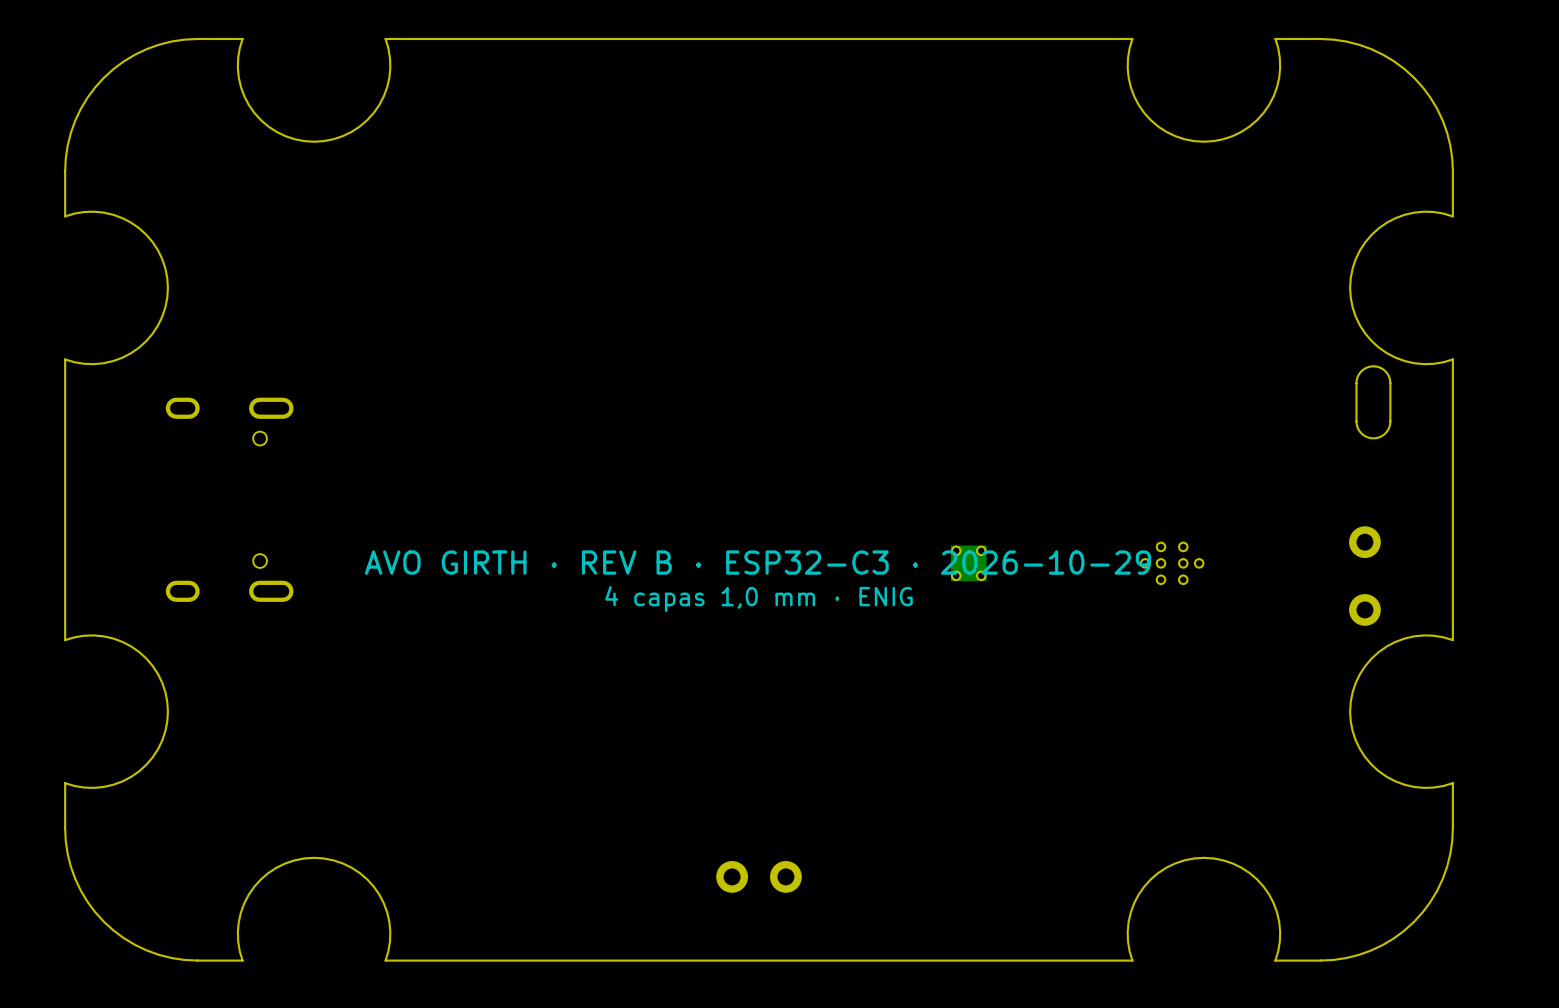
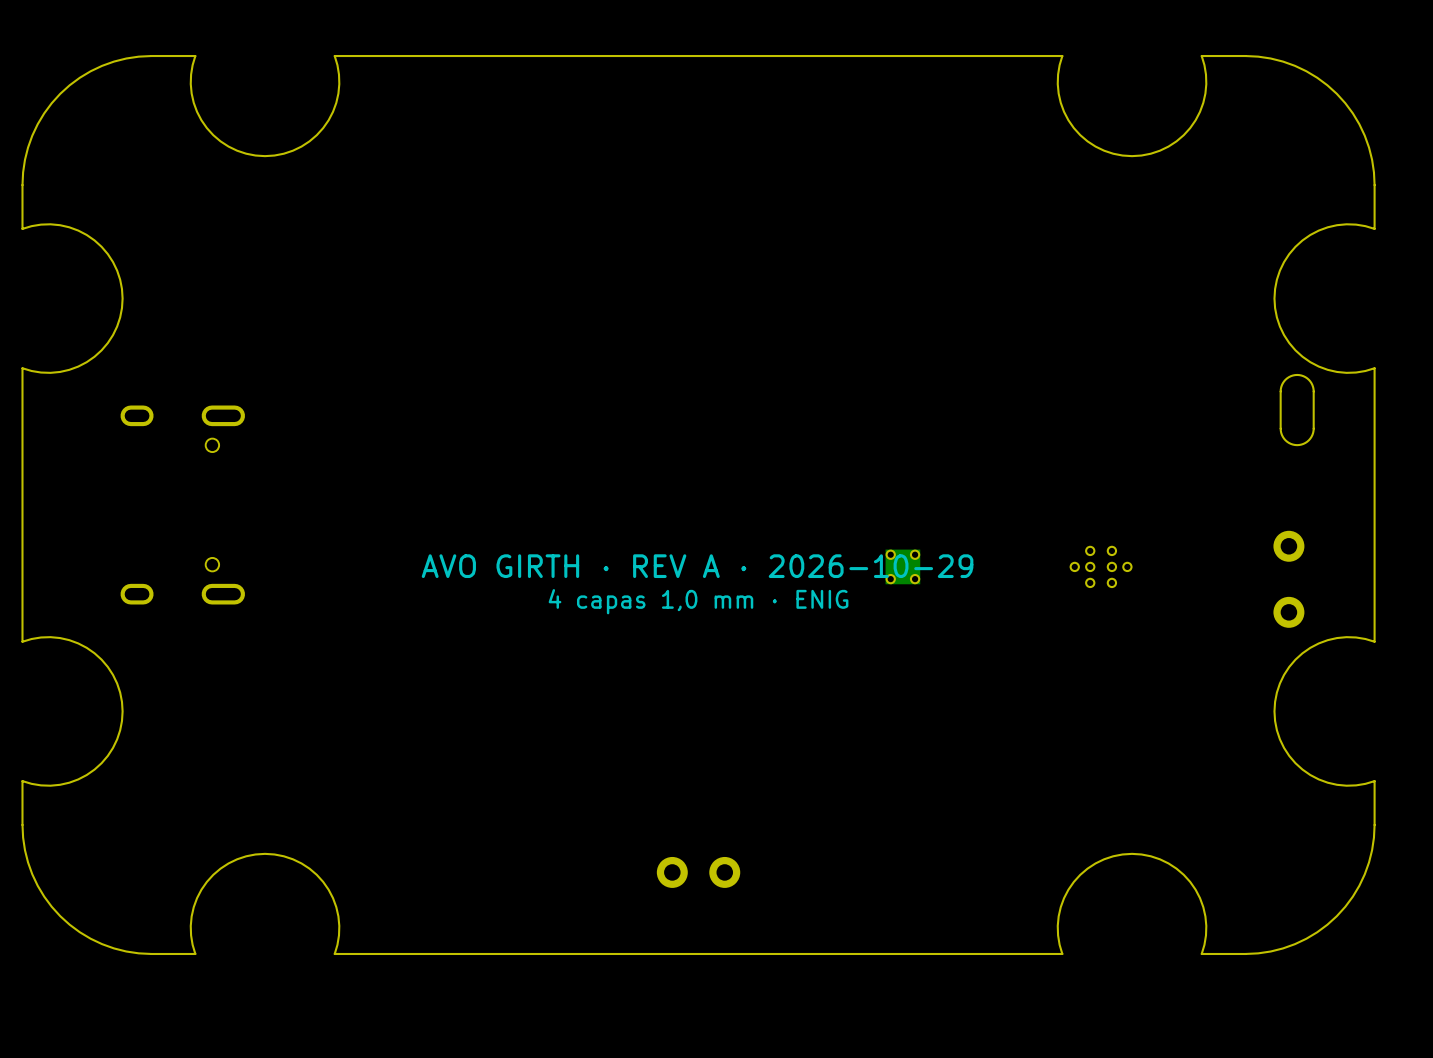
text: AVO GIRTH · REV B · ESP32-C3 · 2026-10-29 (758, 562) -> AVO GIRTH · REV A · 2026-10-29 (697, 566)

